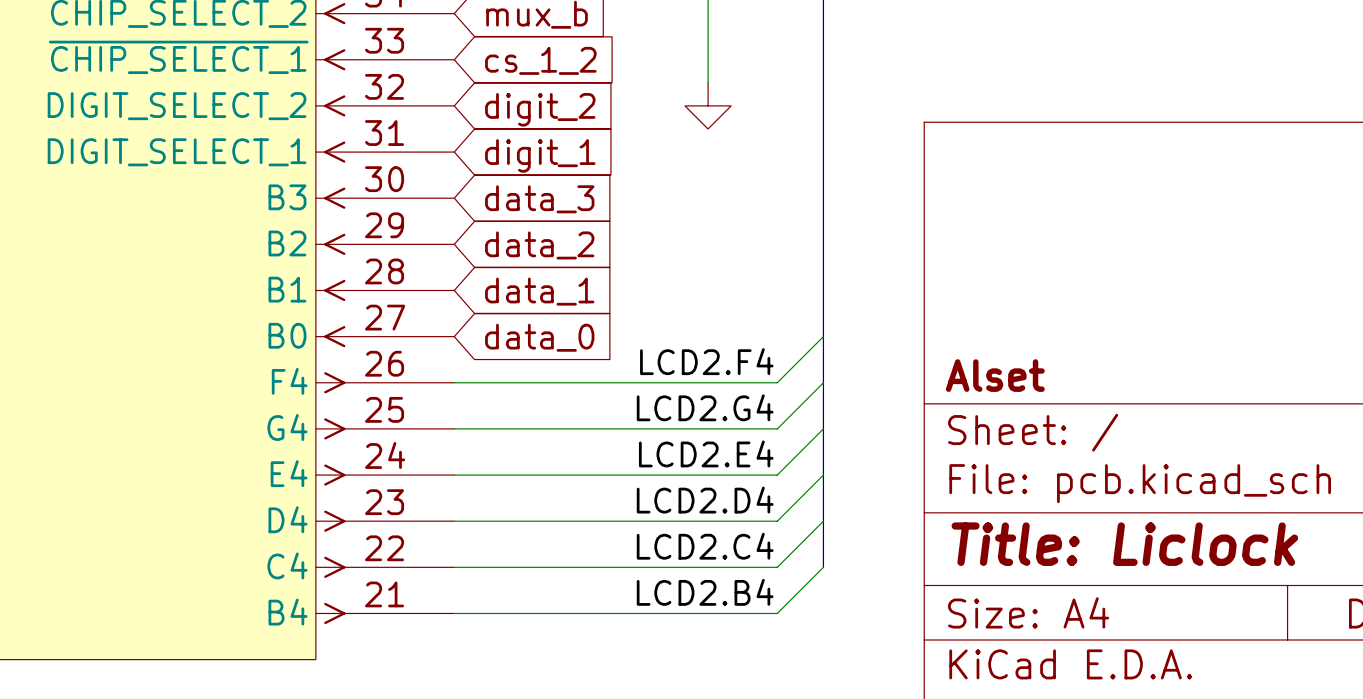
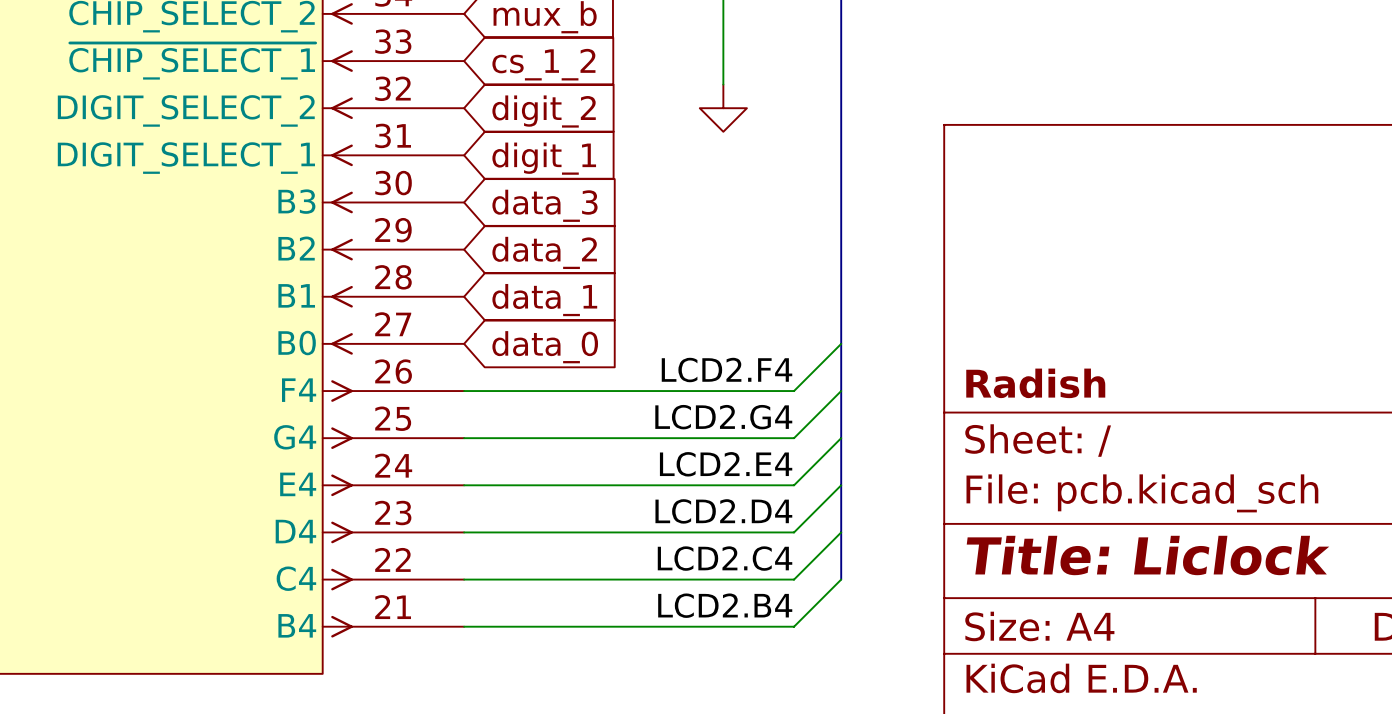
title block: Alset (995, 375) -> Radish (1035, 383)

